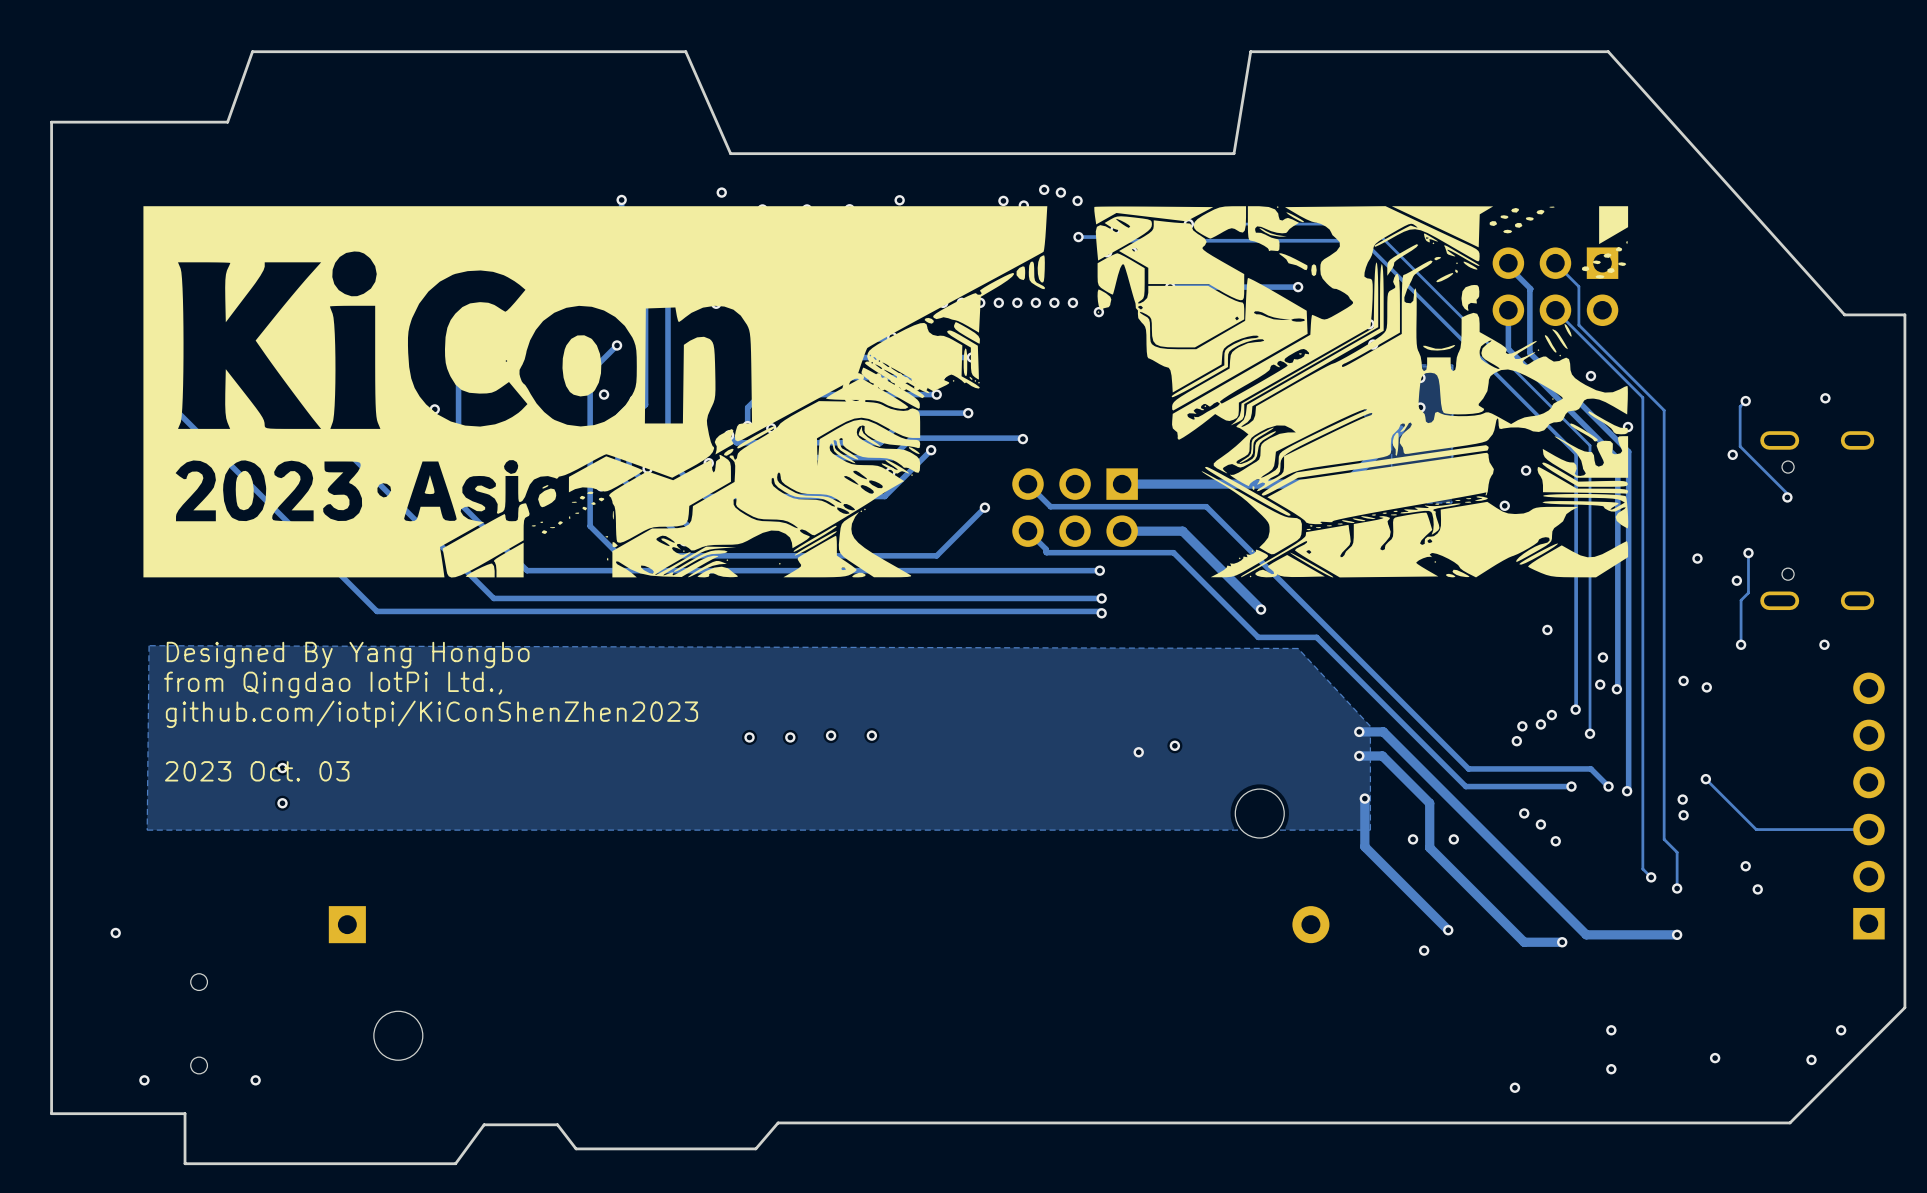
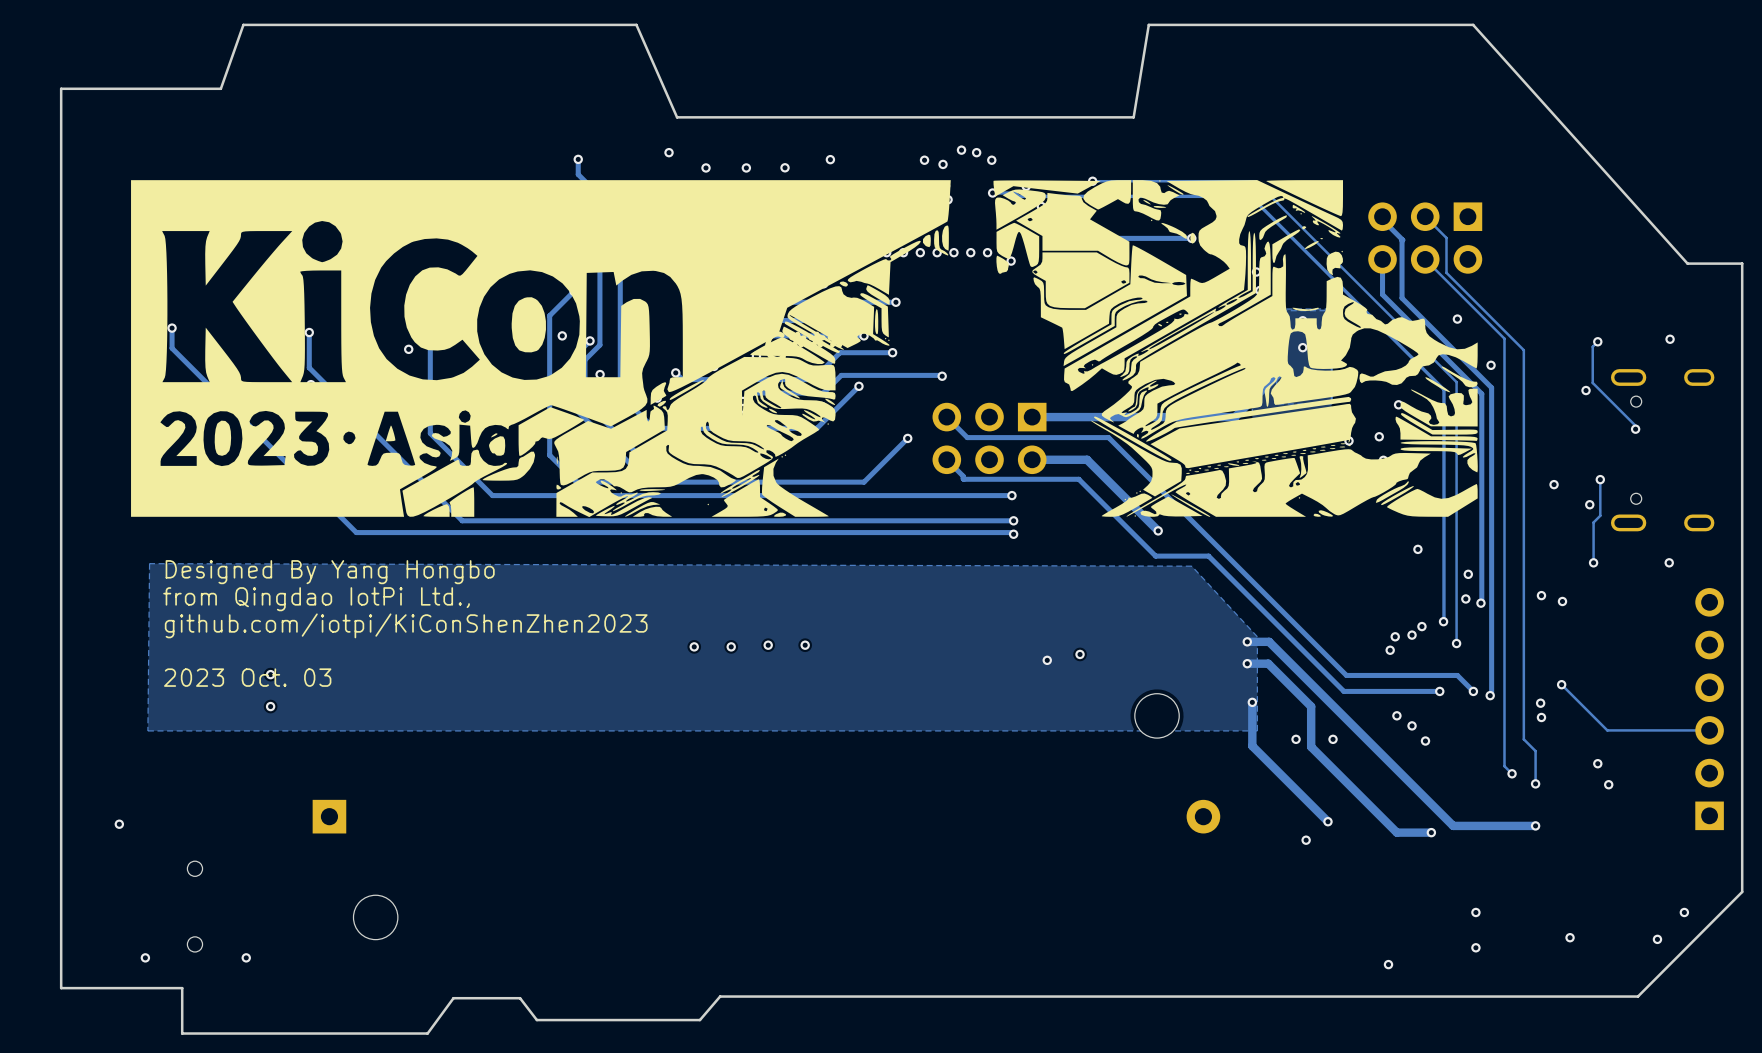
part: (885, 391) -> none
part: none -> (804, 348)

